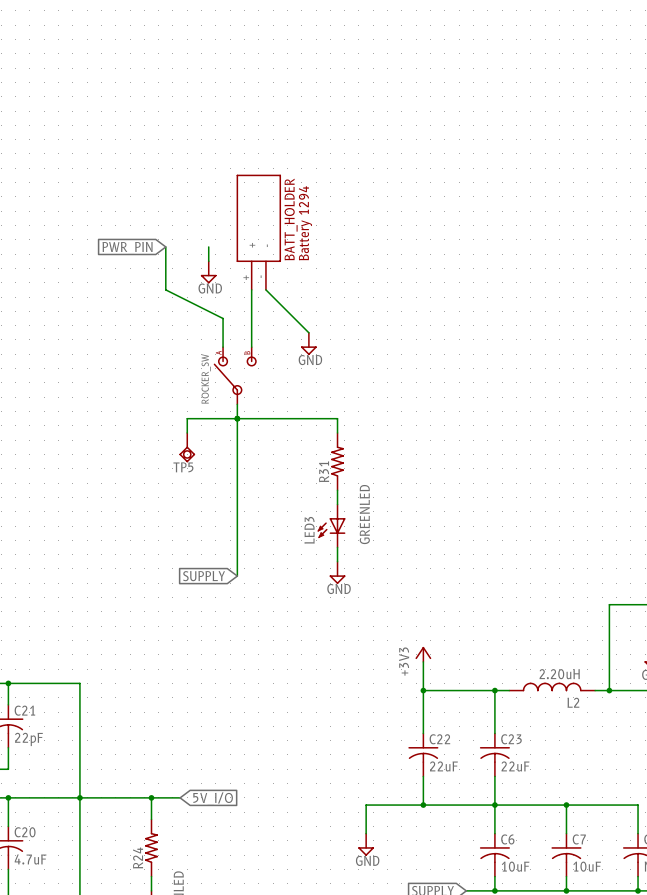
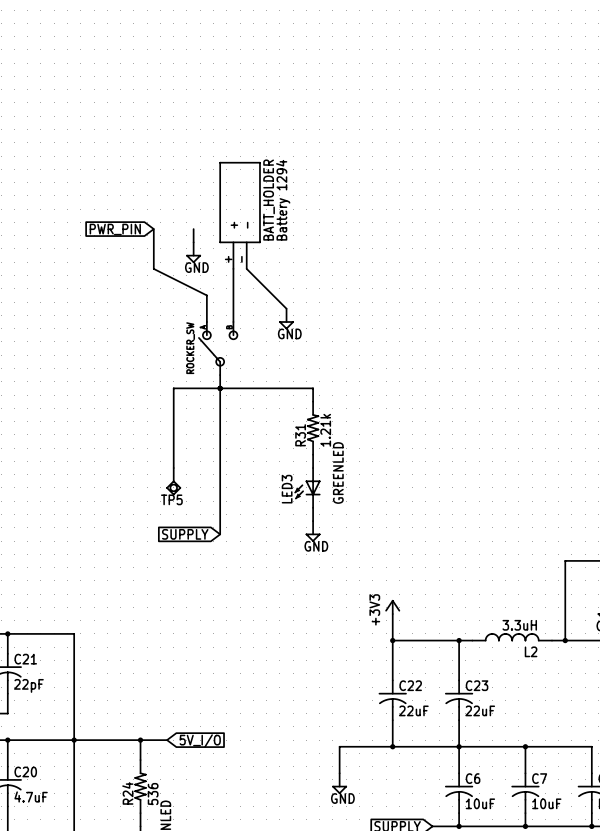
wire: none -> (173, 401) (173, 468)
TP5 position: (187, 447) -> (173, 481)
R31 value: none -> 1.21k (325, 430)
L2 value: 2.20uH (559, 674) -> 3.3uH (519, 625)
R24 value: none -> 536 (153, 794)

